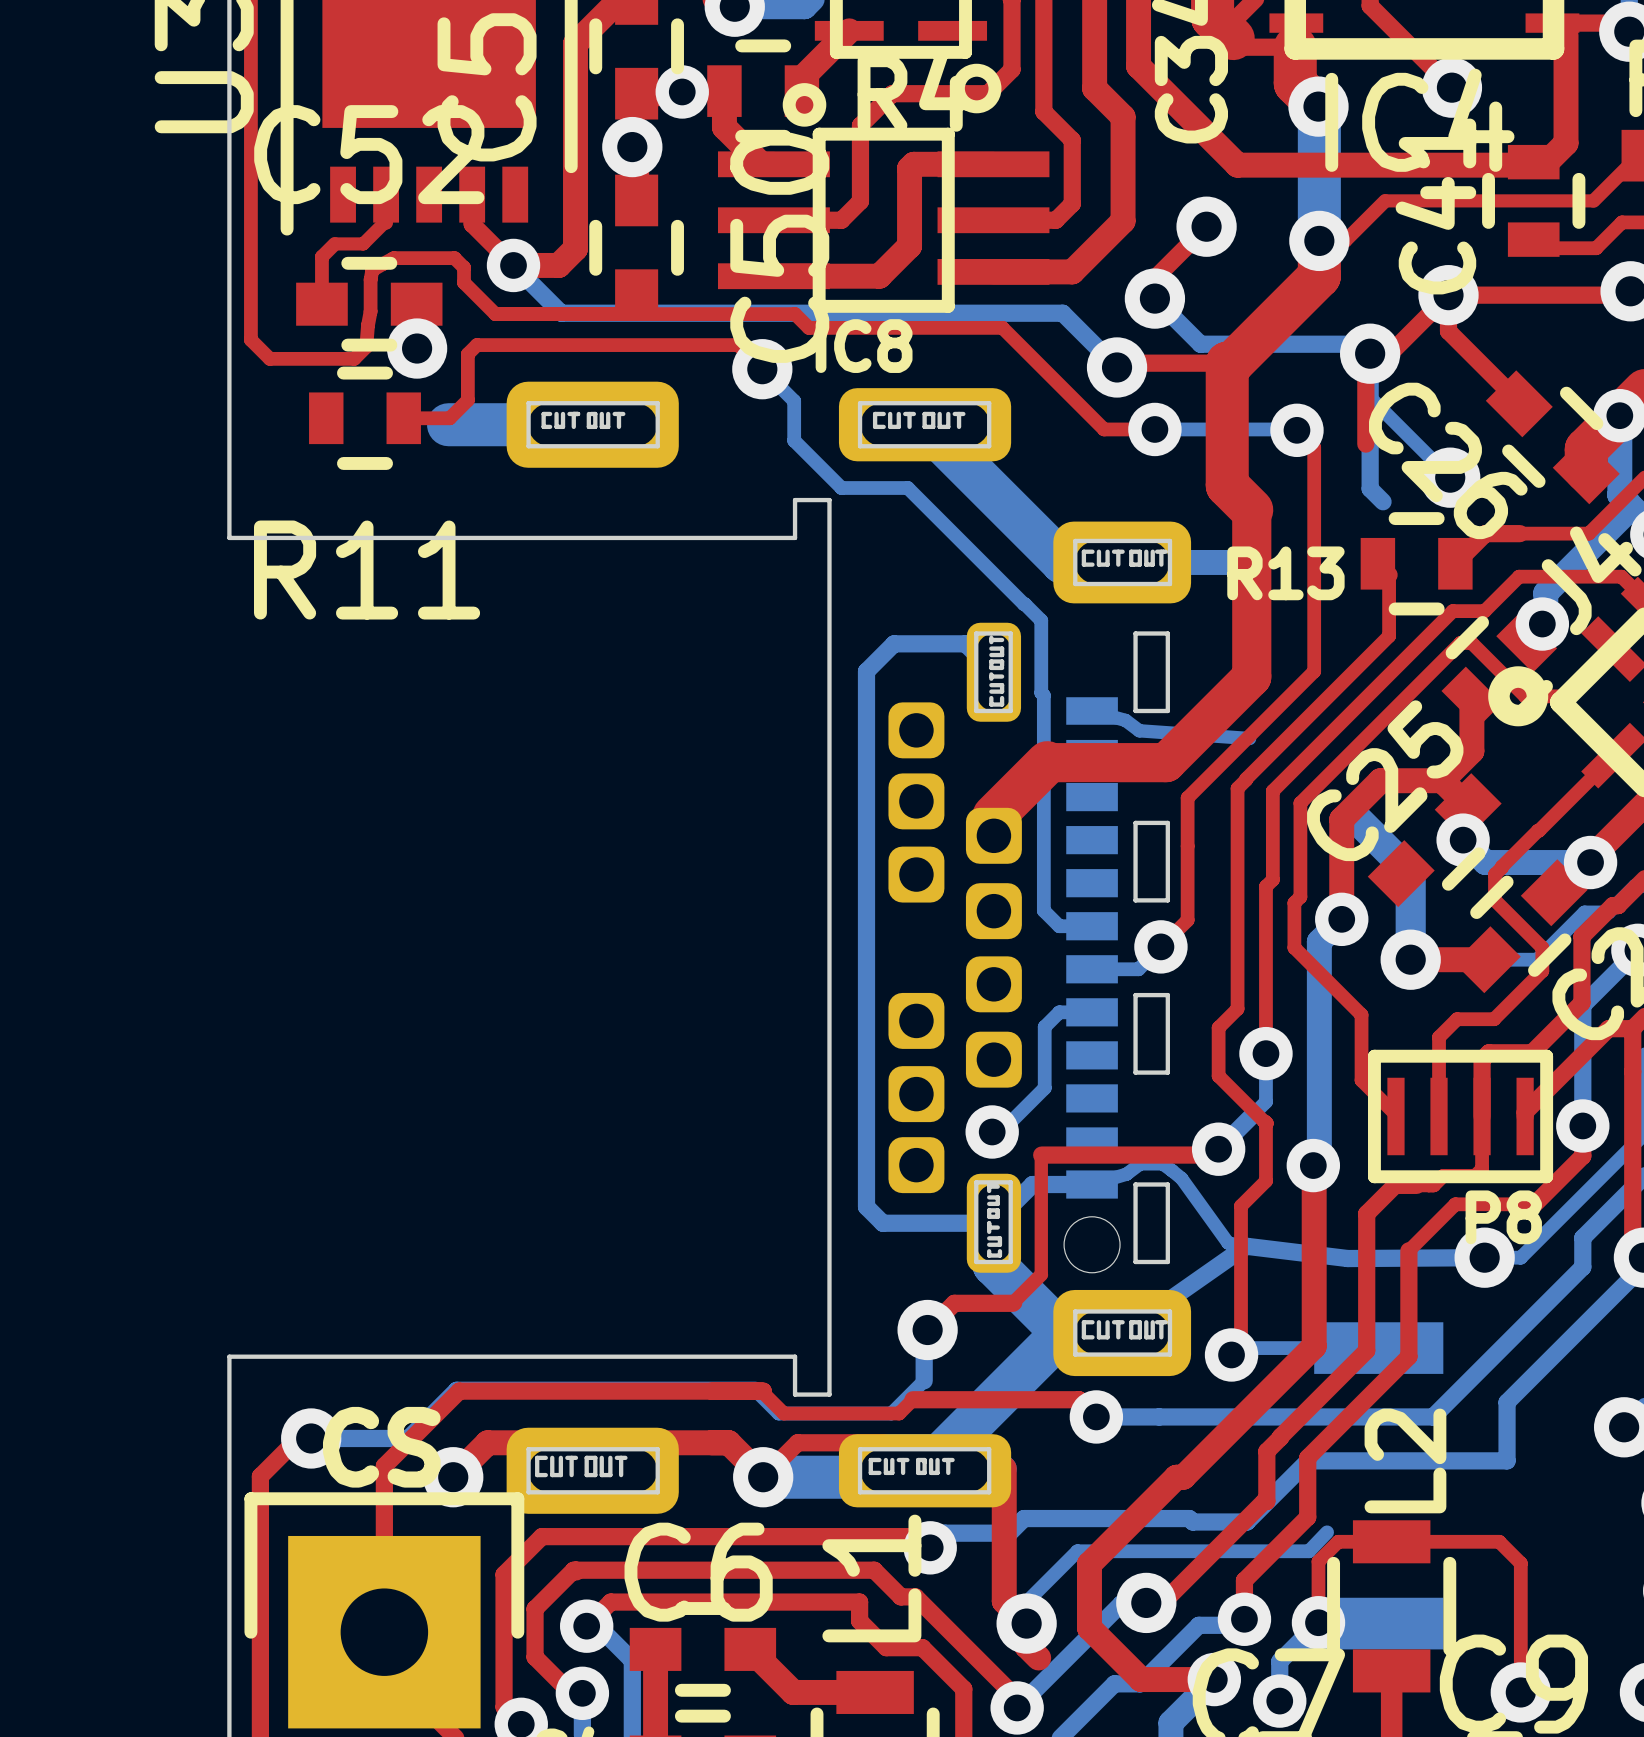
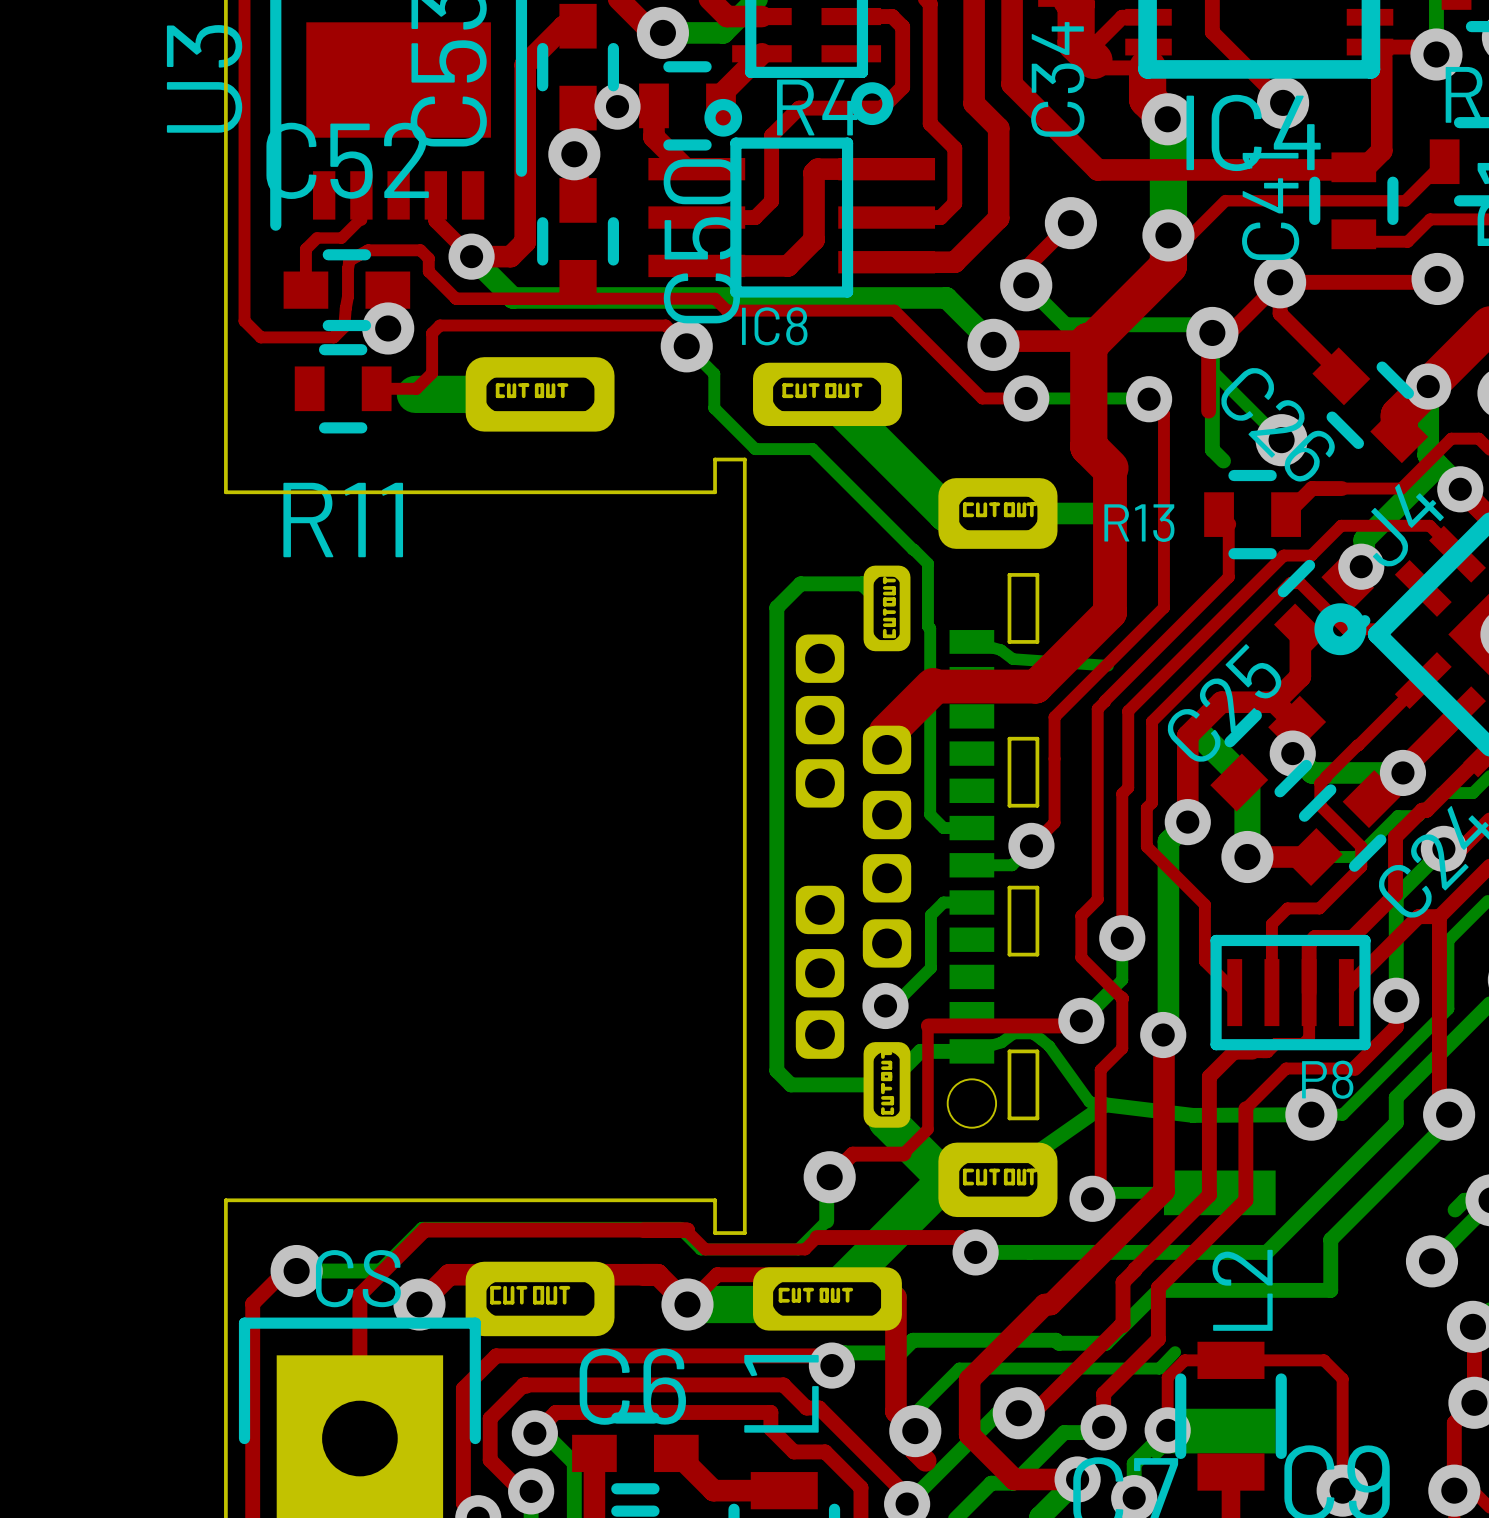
bottom track width: thin (513, 265) (561, 313) (1062, 313) (1117, 367) -> thick (471, 256) (512, 297) (946, 297) (993, 344)
top track width: thin (1121, 363) (1232, 363) -> thick (997, 341) (1093, 341)

